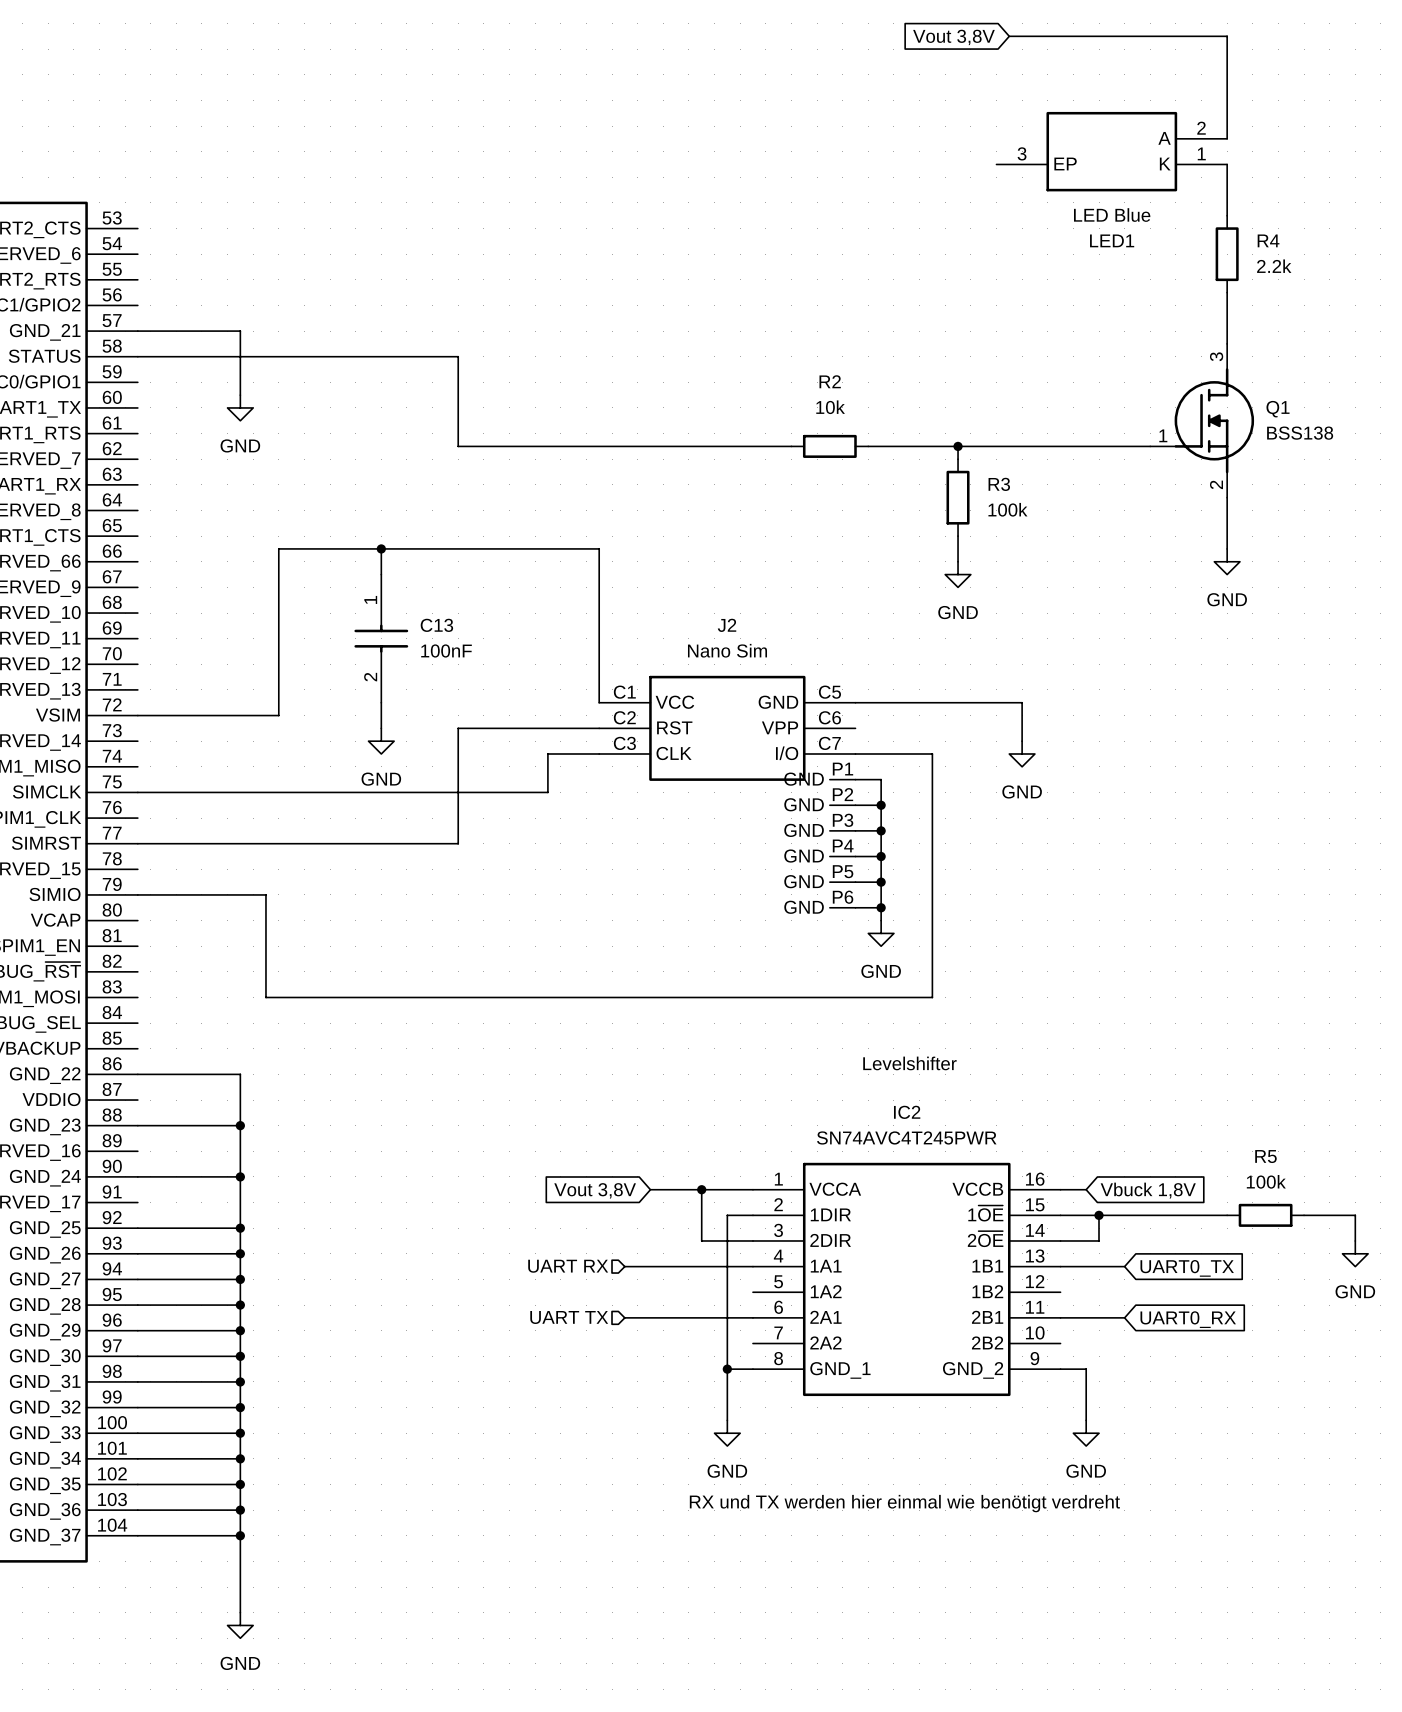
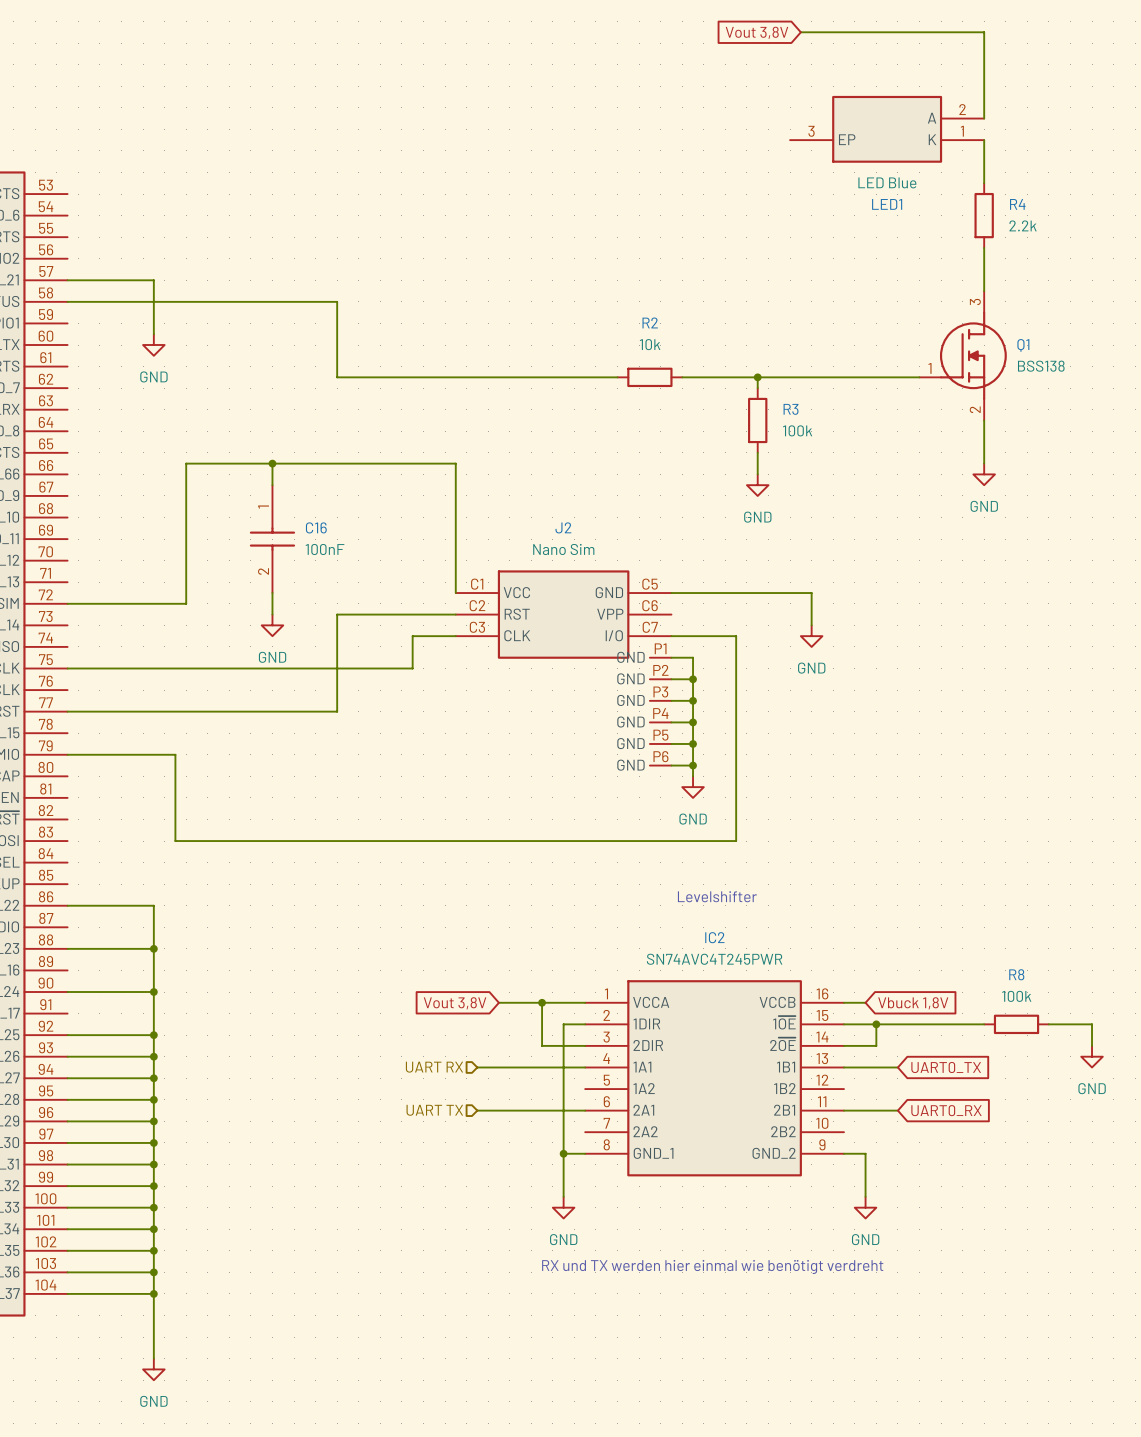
C13 name: C13 (436, 625) -> C16 (316, 527)
R5 name: R5 (1265, 1156) -> R8 (1016, 974)

